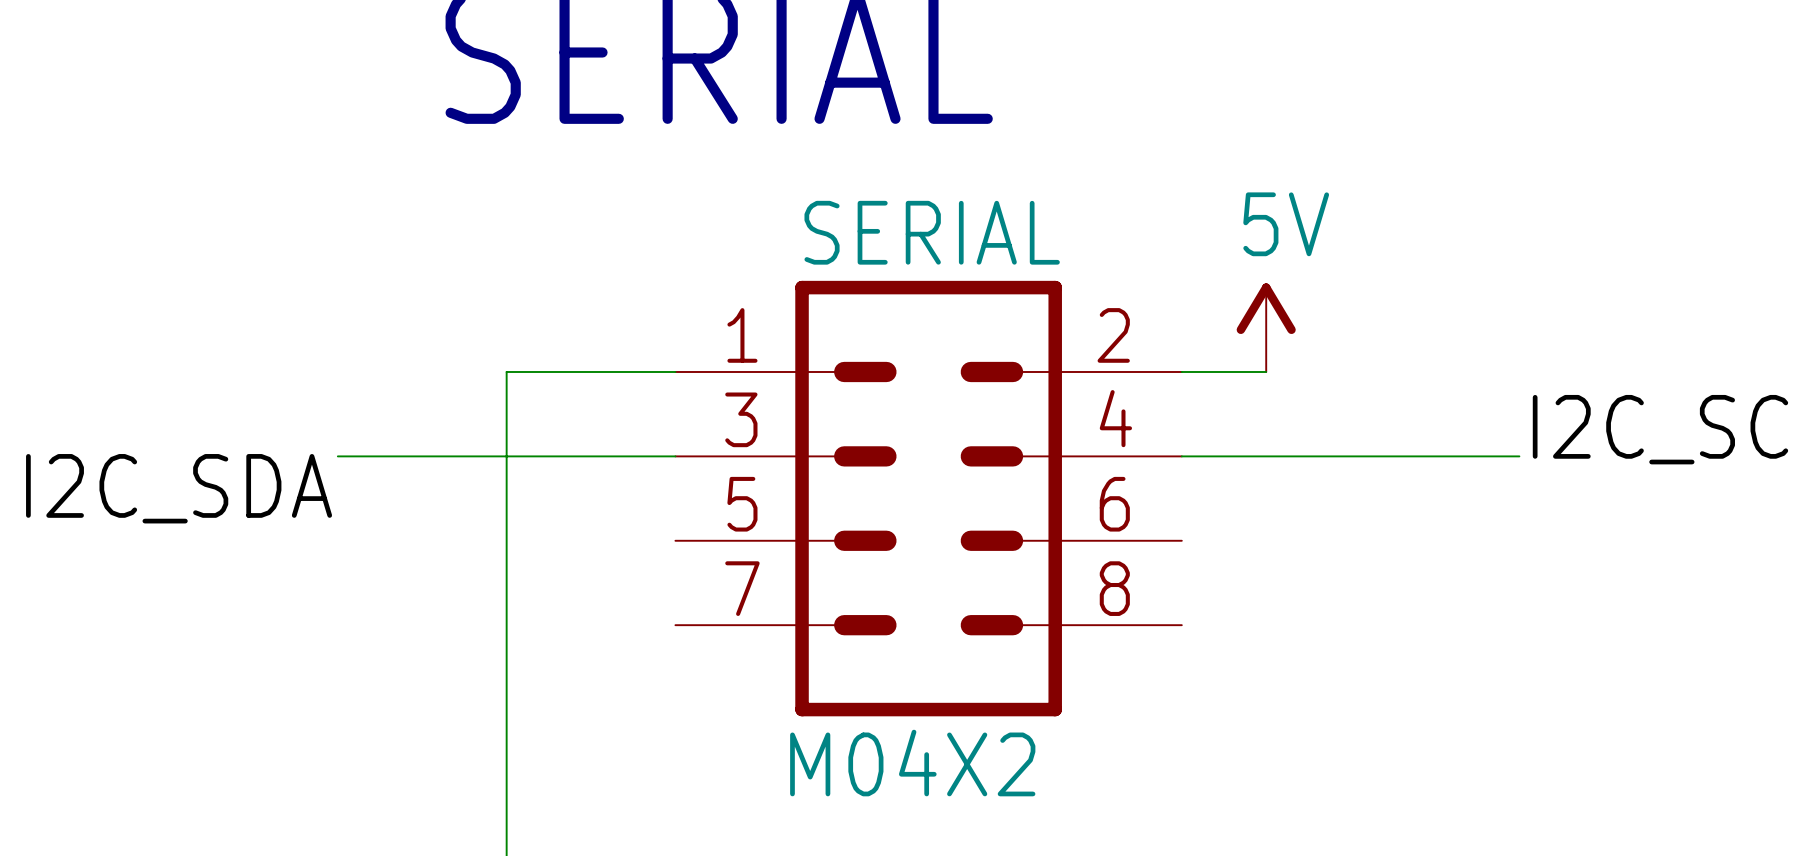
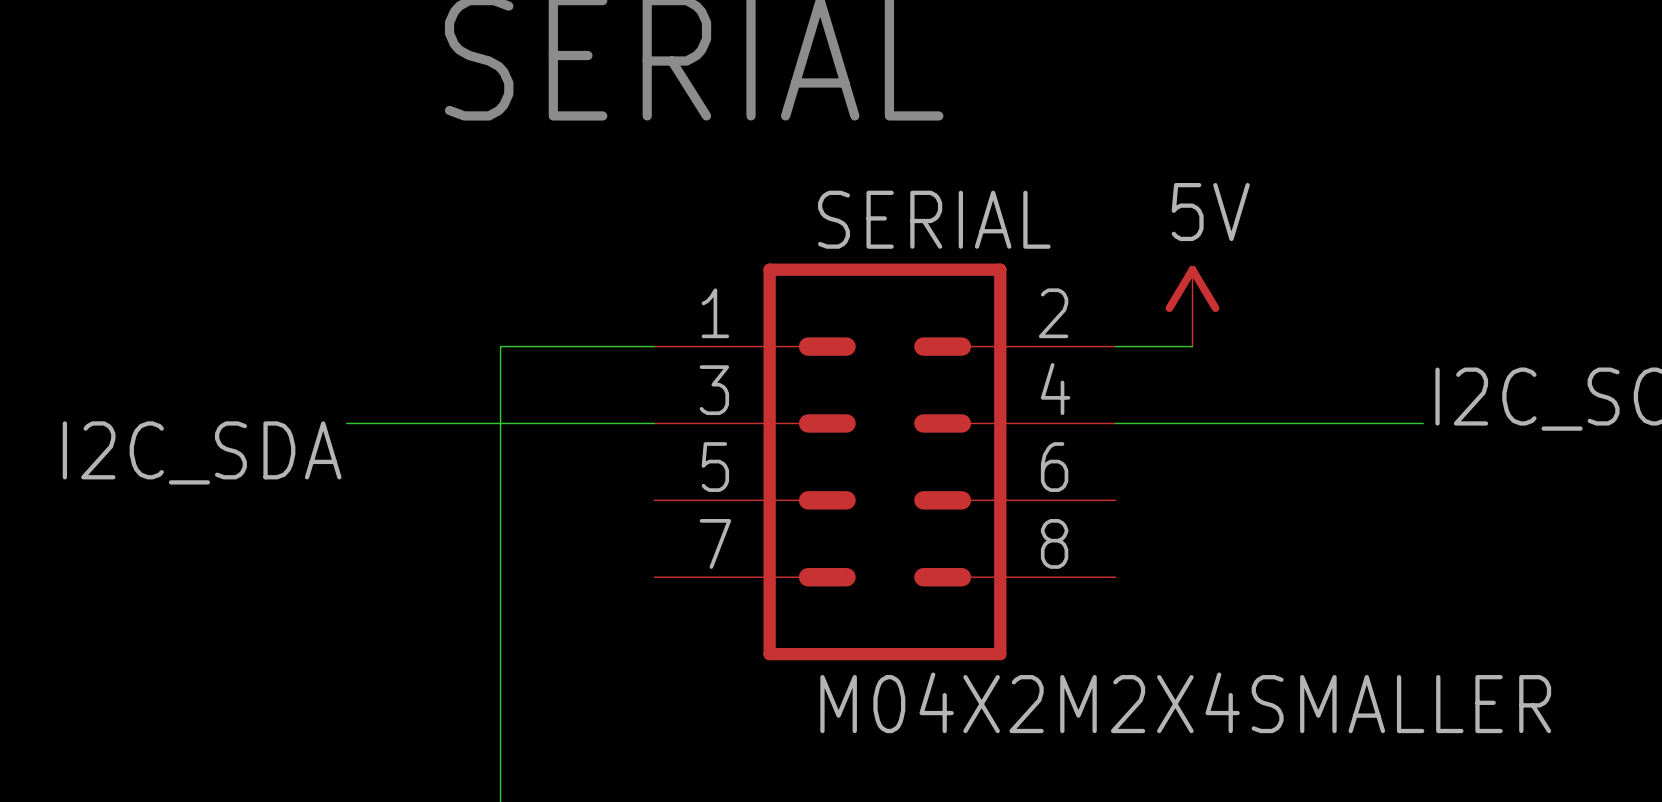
SERIAL name position: SERIAL (932, 232) -> SERIAL (934, 219)
SERIAL value: M04X2 (912, 763) -> M04X2M2X4SMALLER (1185, 702)

